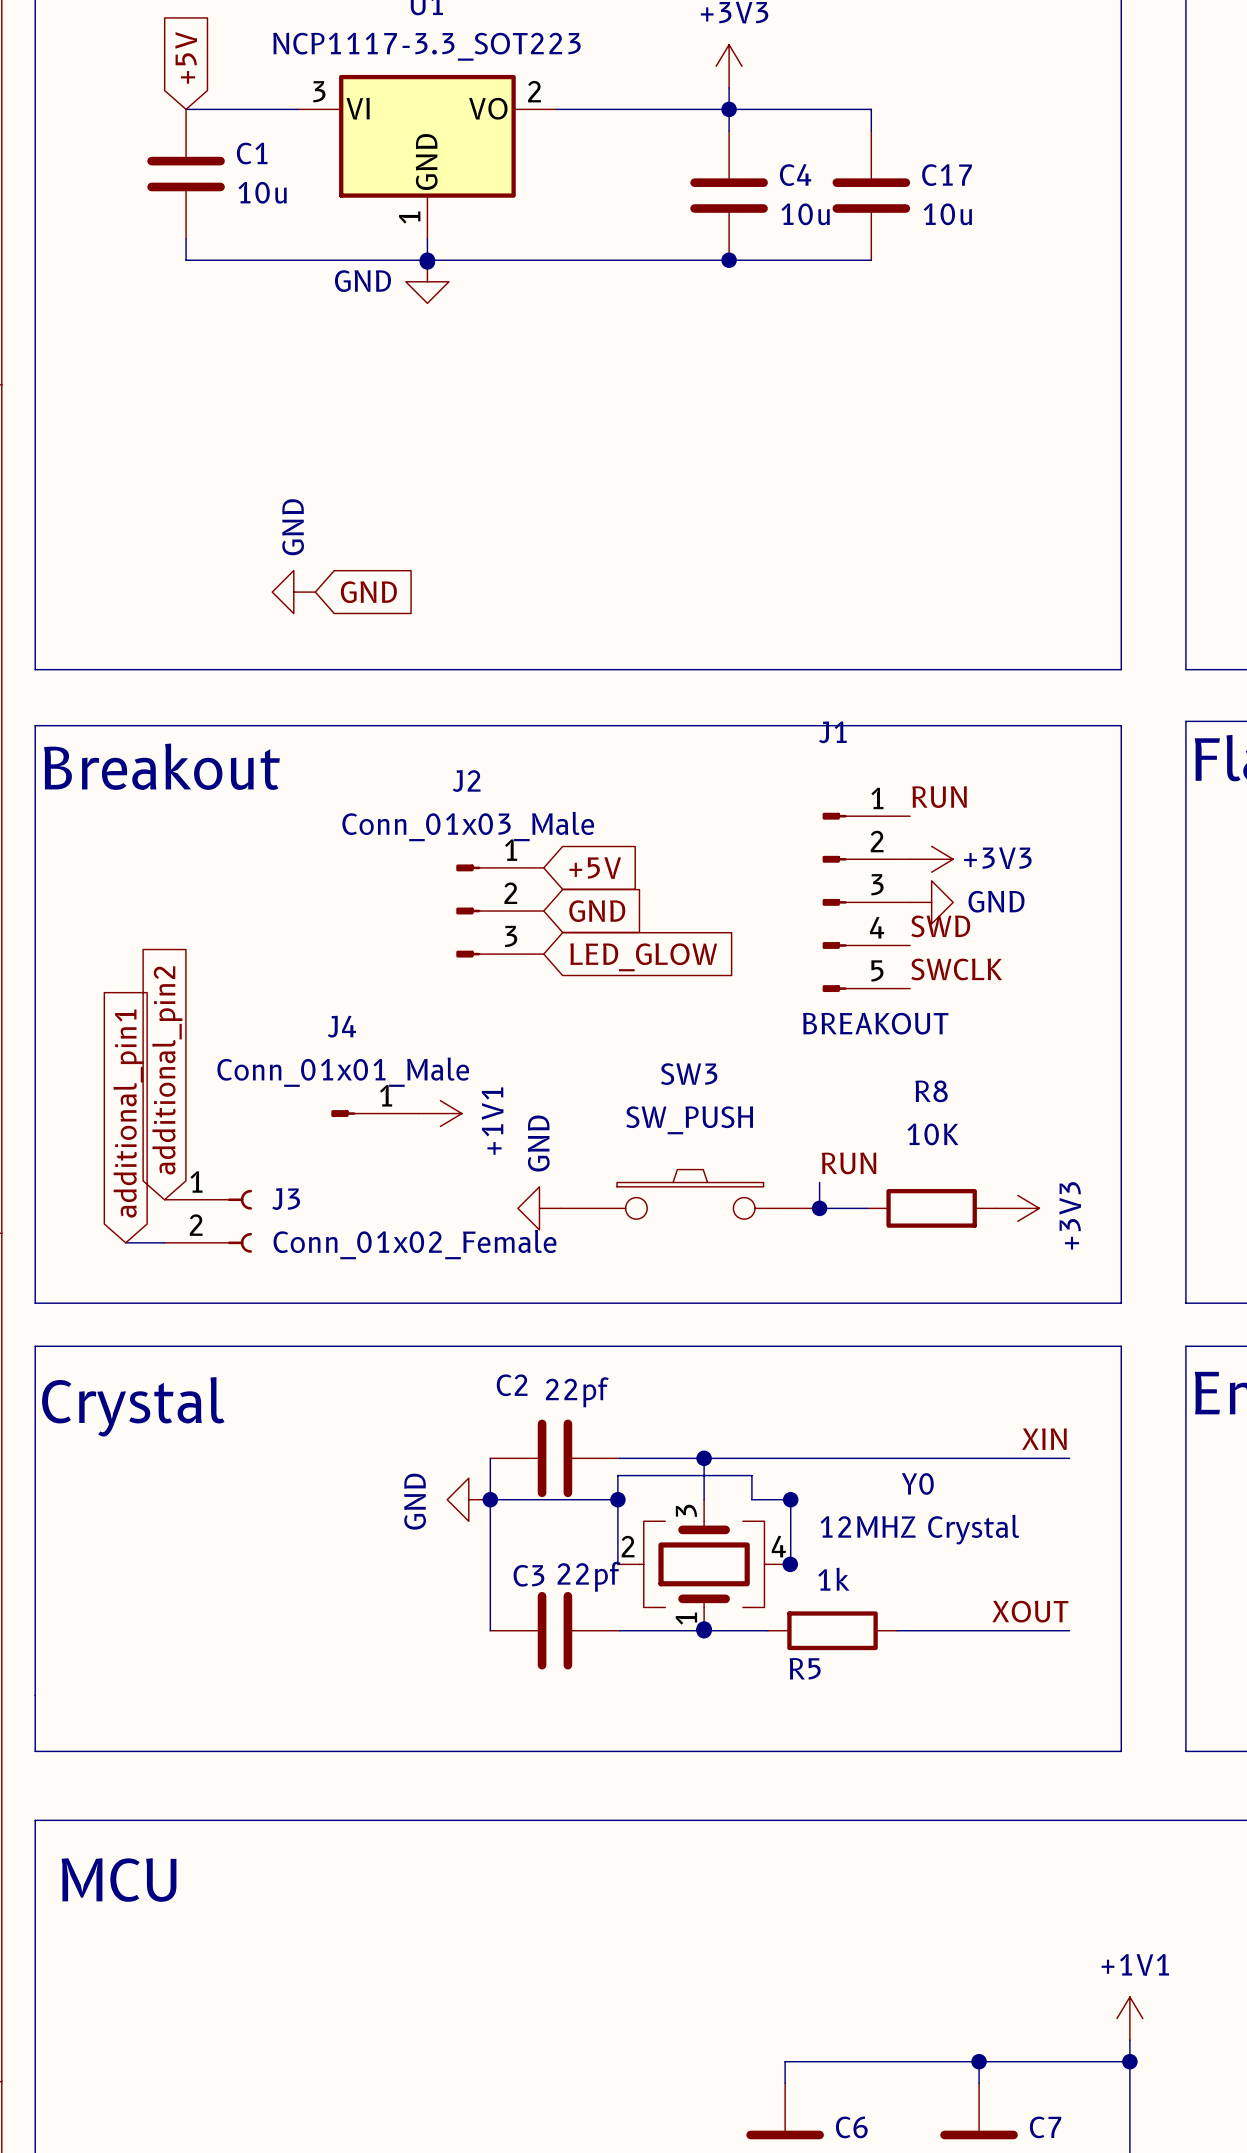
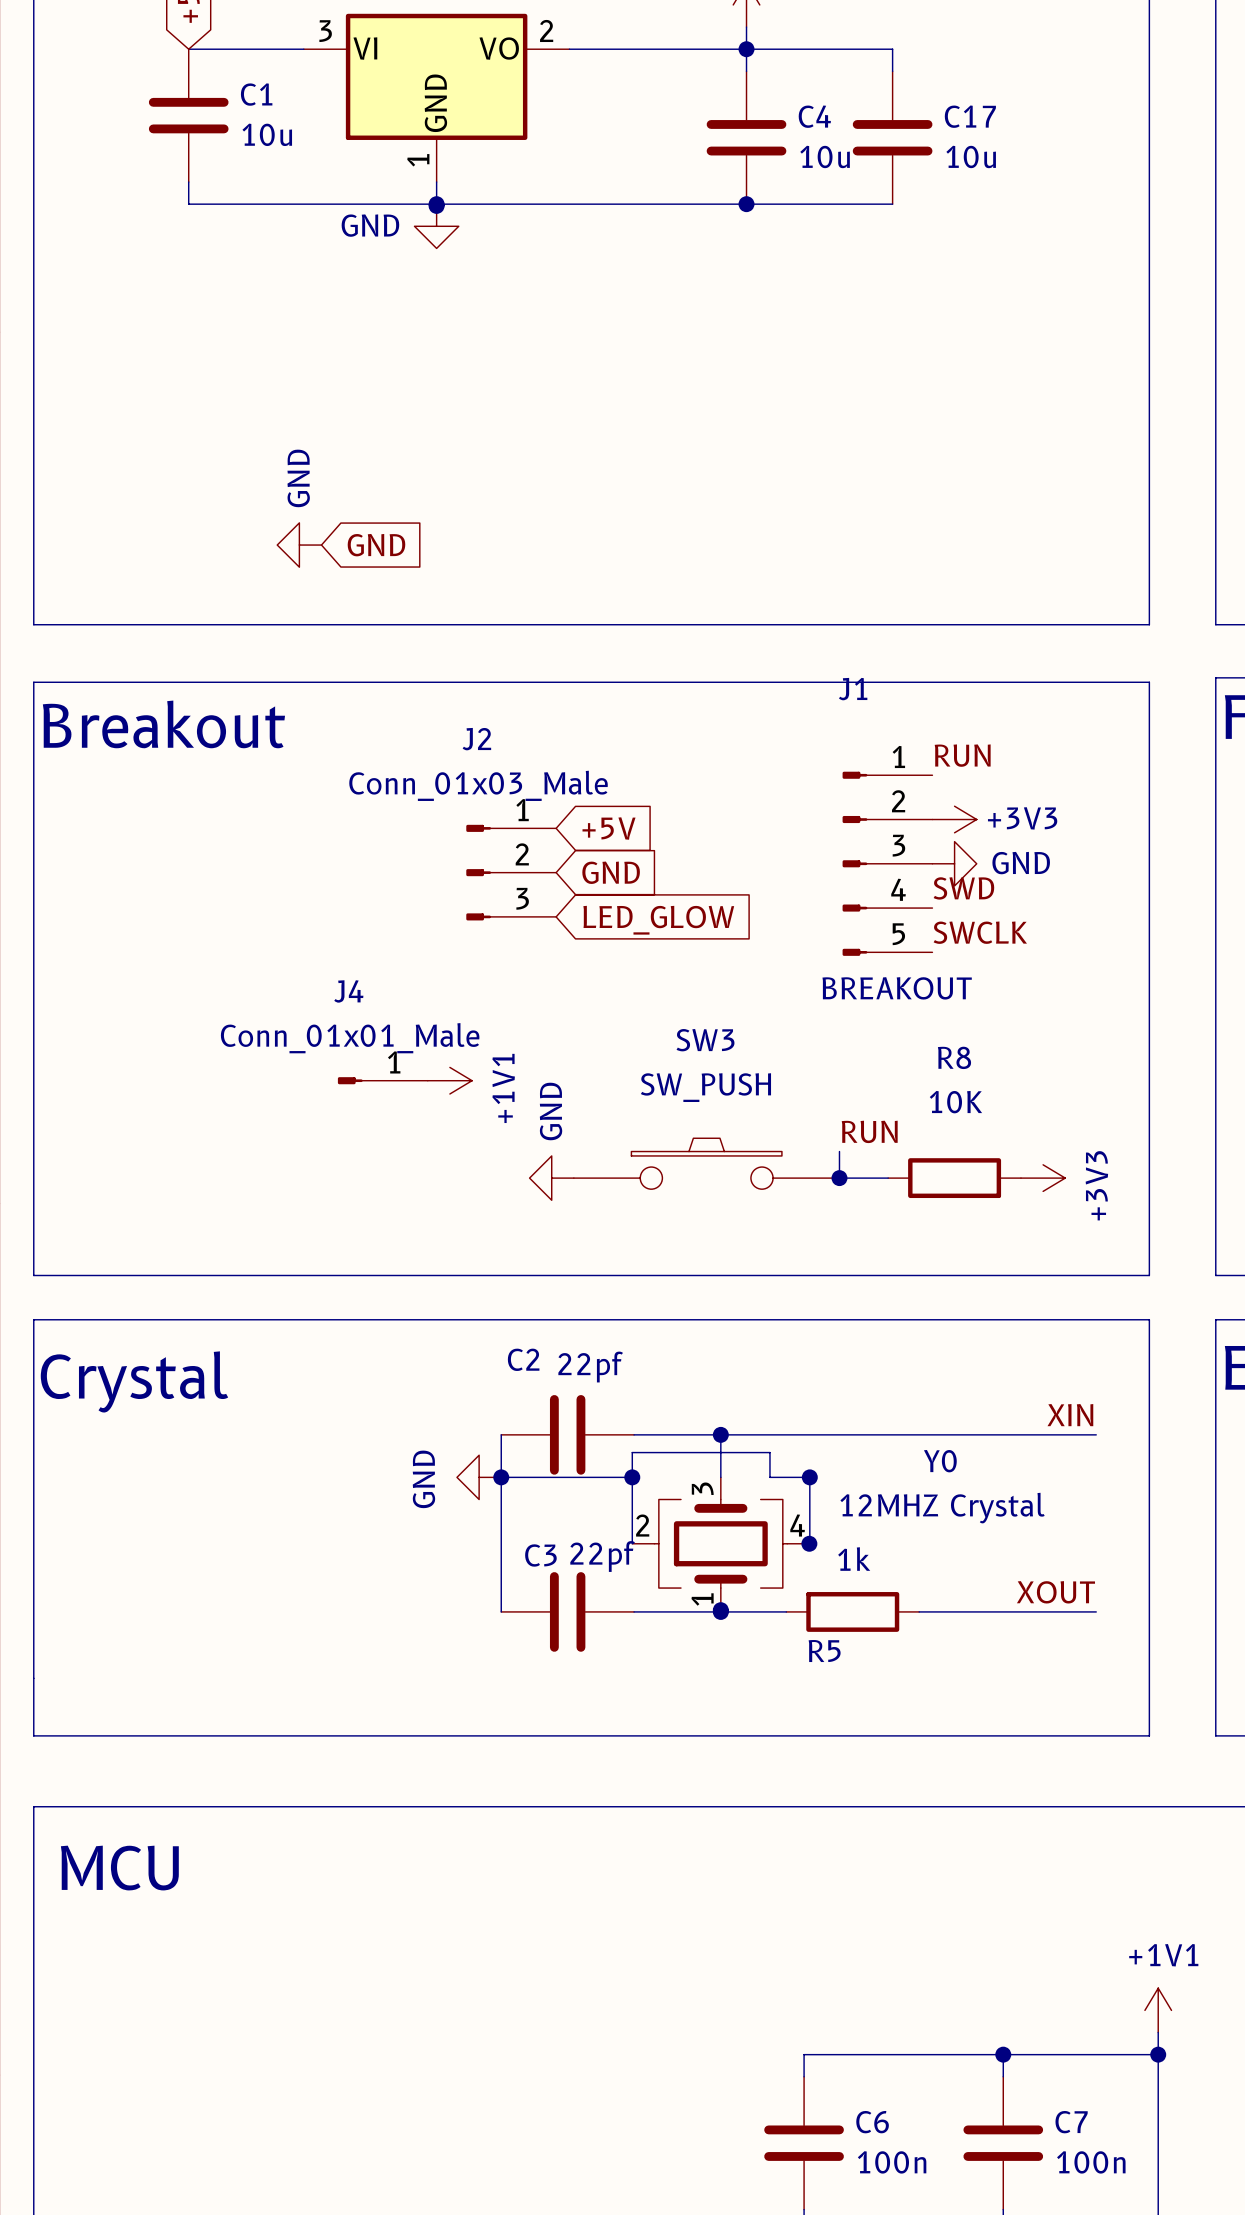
global label: additional_pin2 (167, 1070) -> none
global label: additional_pin1 (128, 1113) -> none
J3: Conn_01x02_Female (208, 1221) -> none
wire: (125, 1242) (164, 1242) -> none

